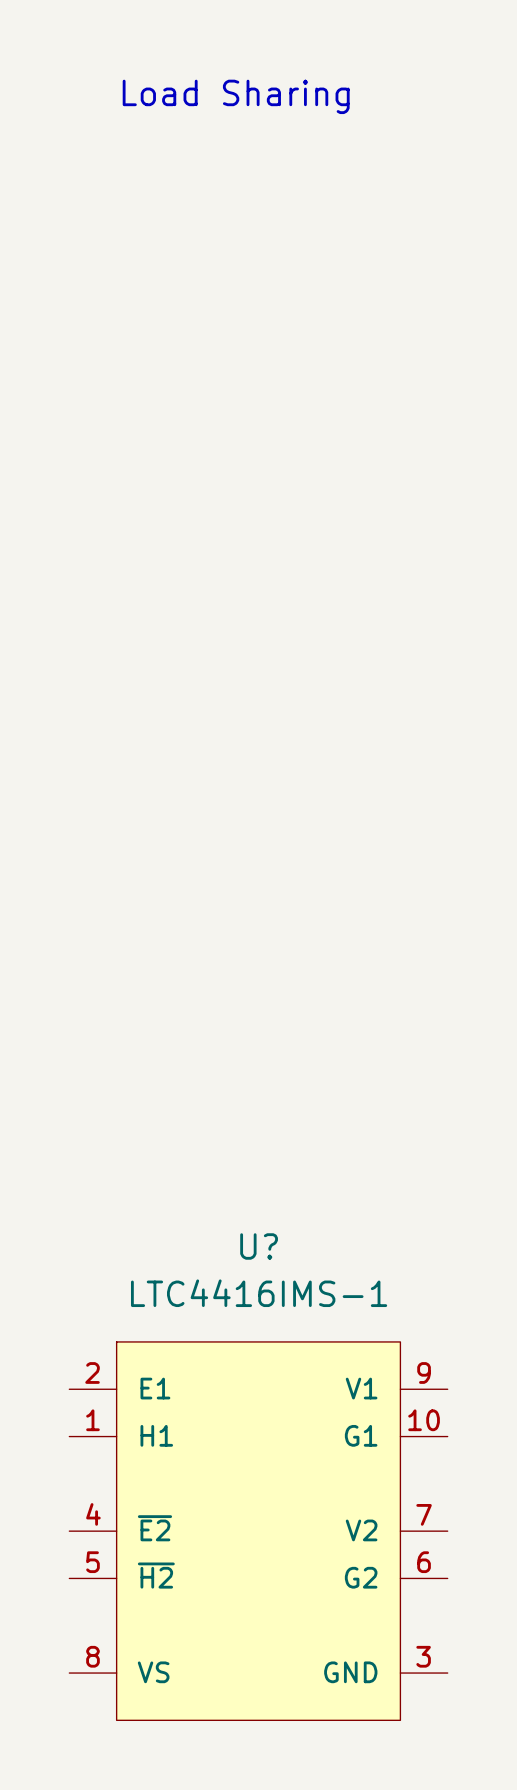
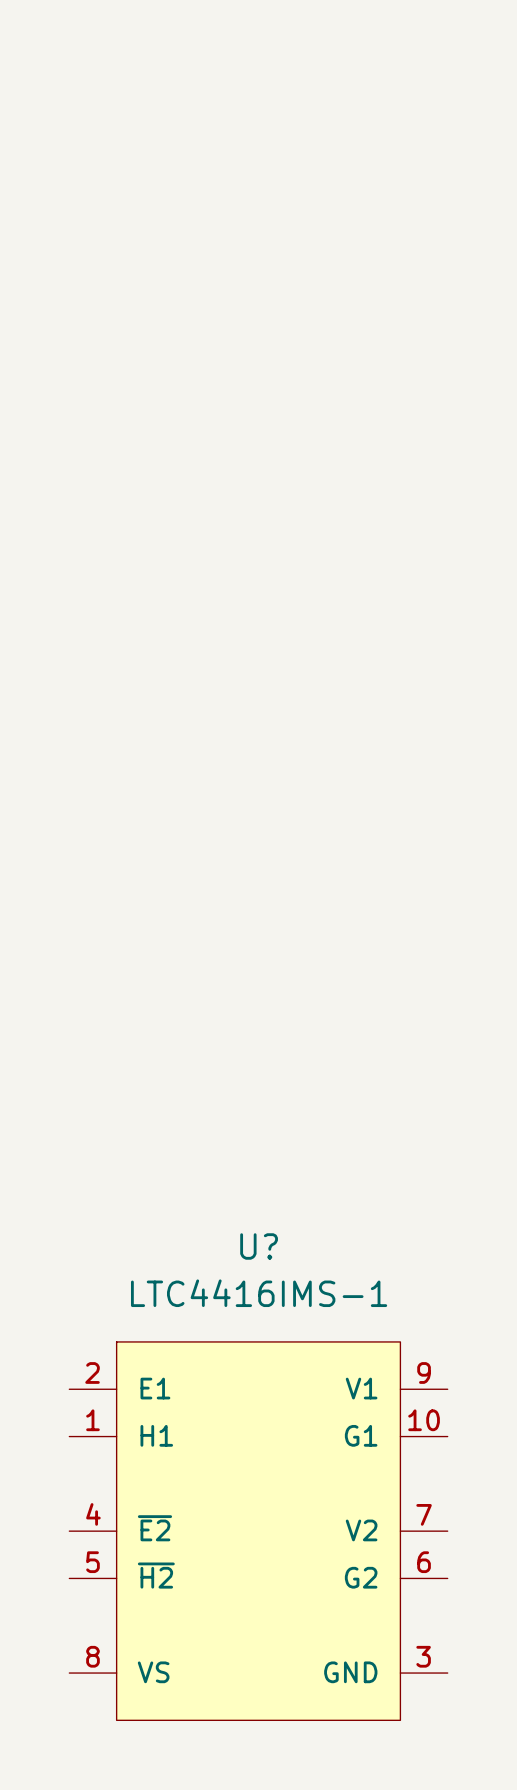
text: Load Sharing (236, 96) -> none

